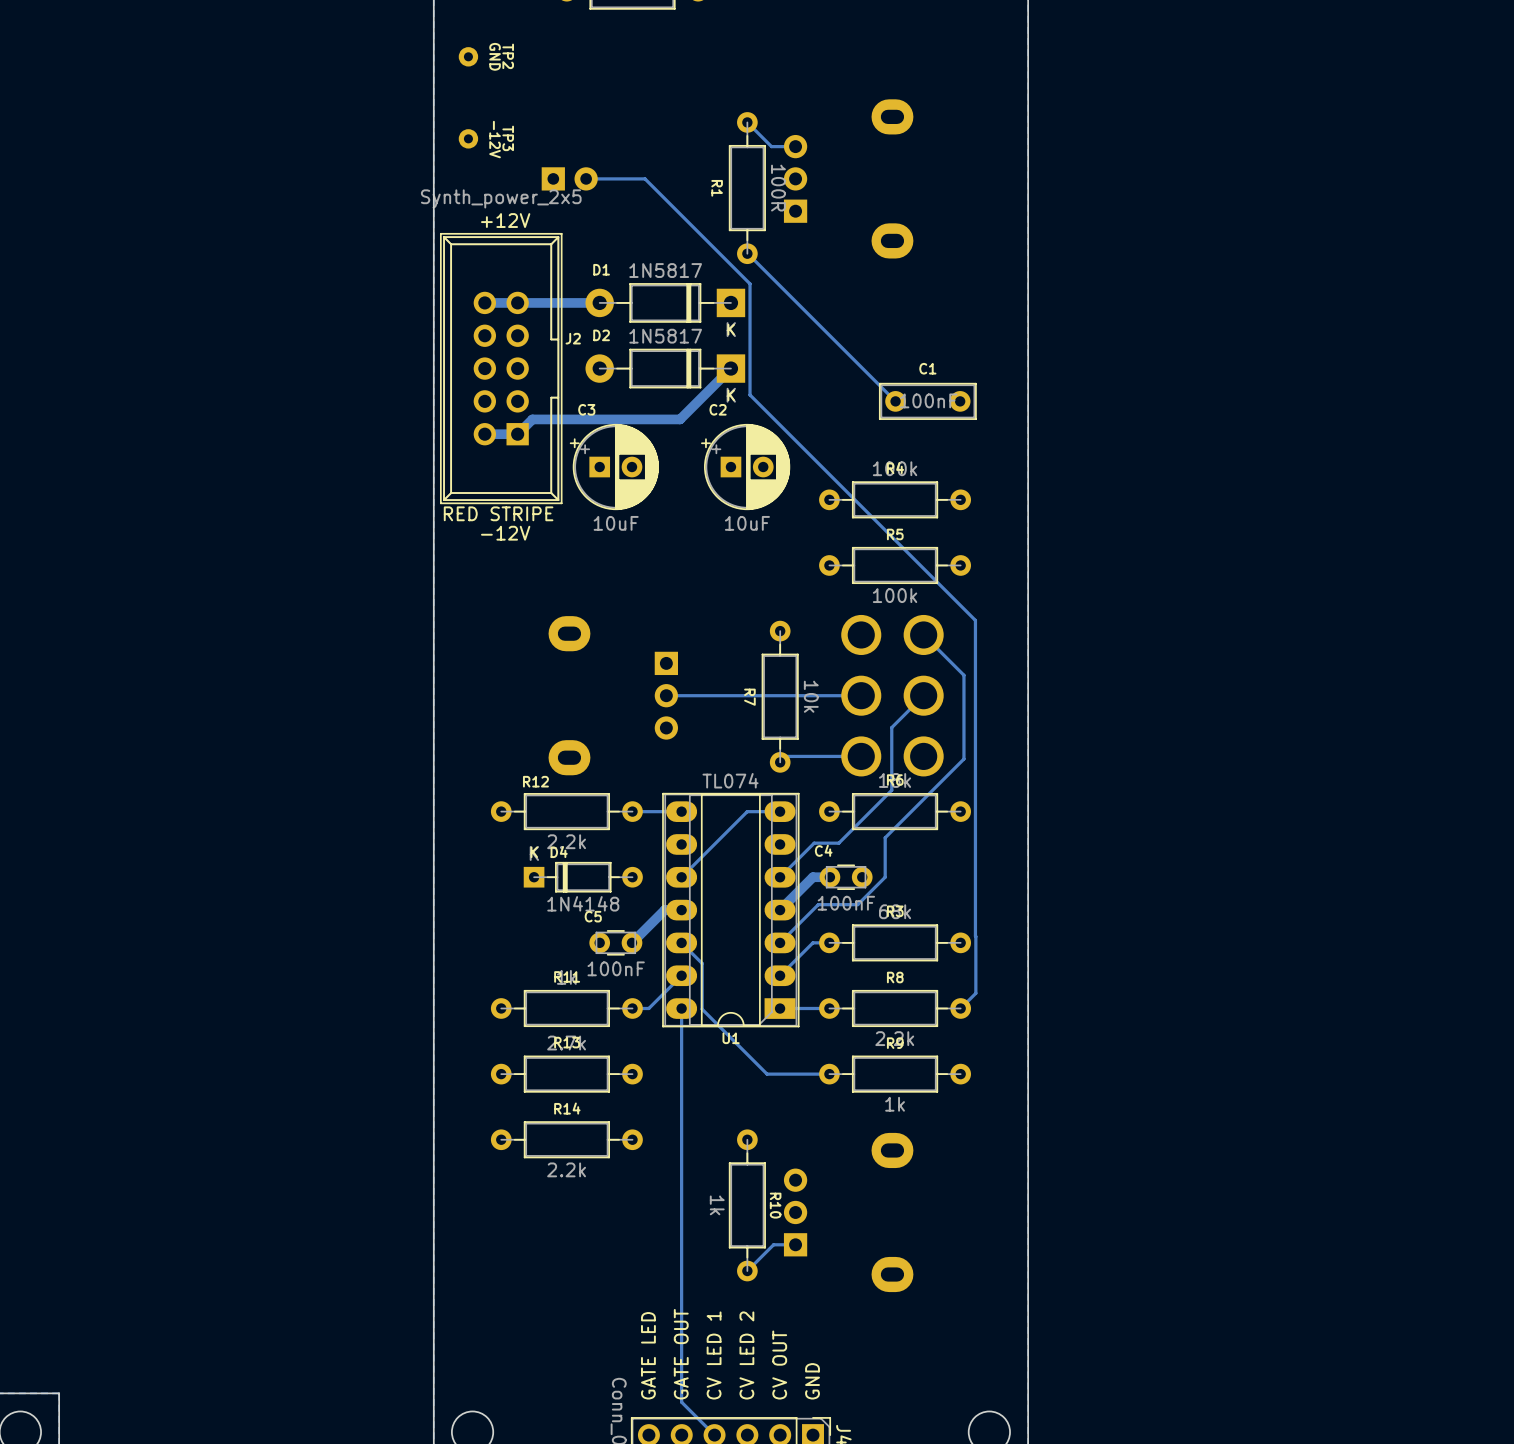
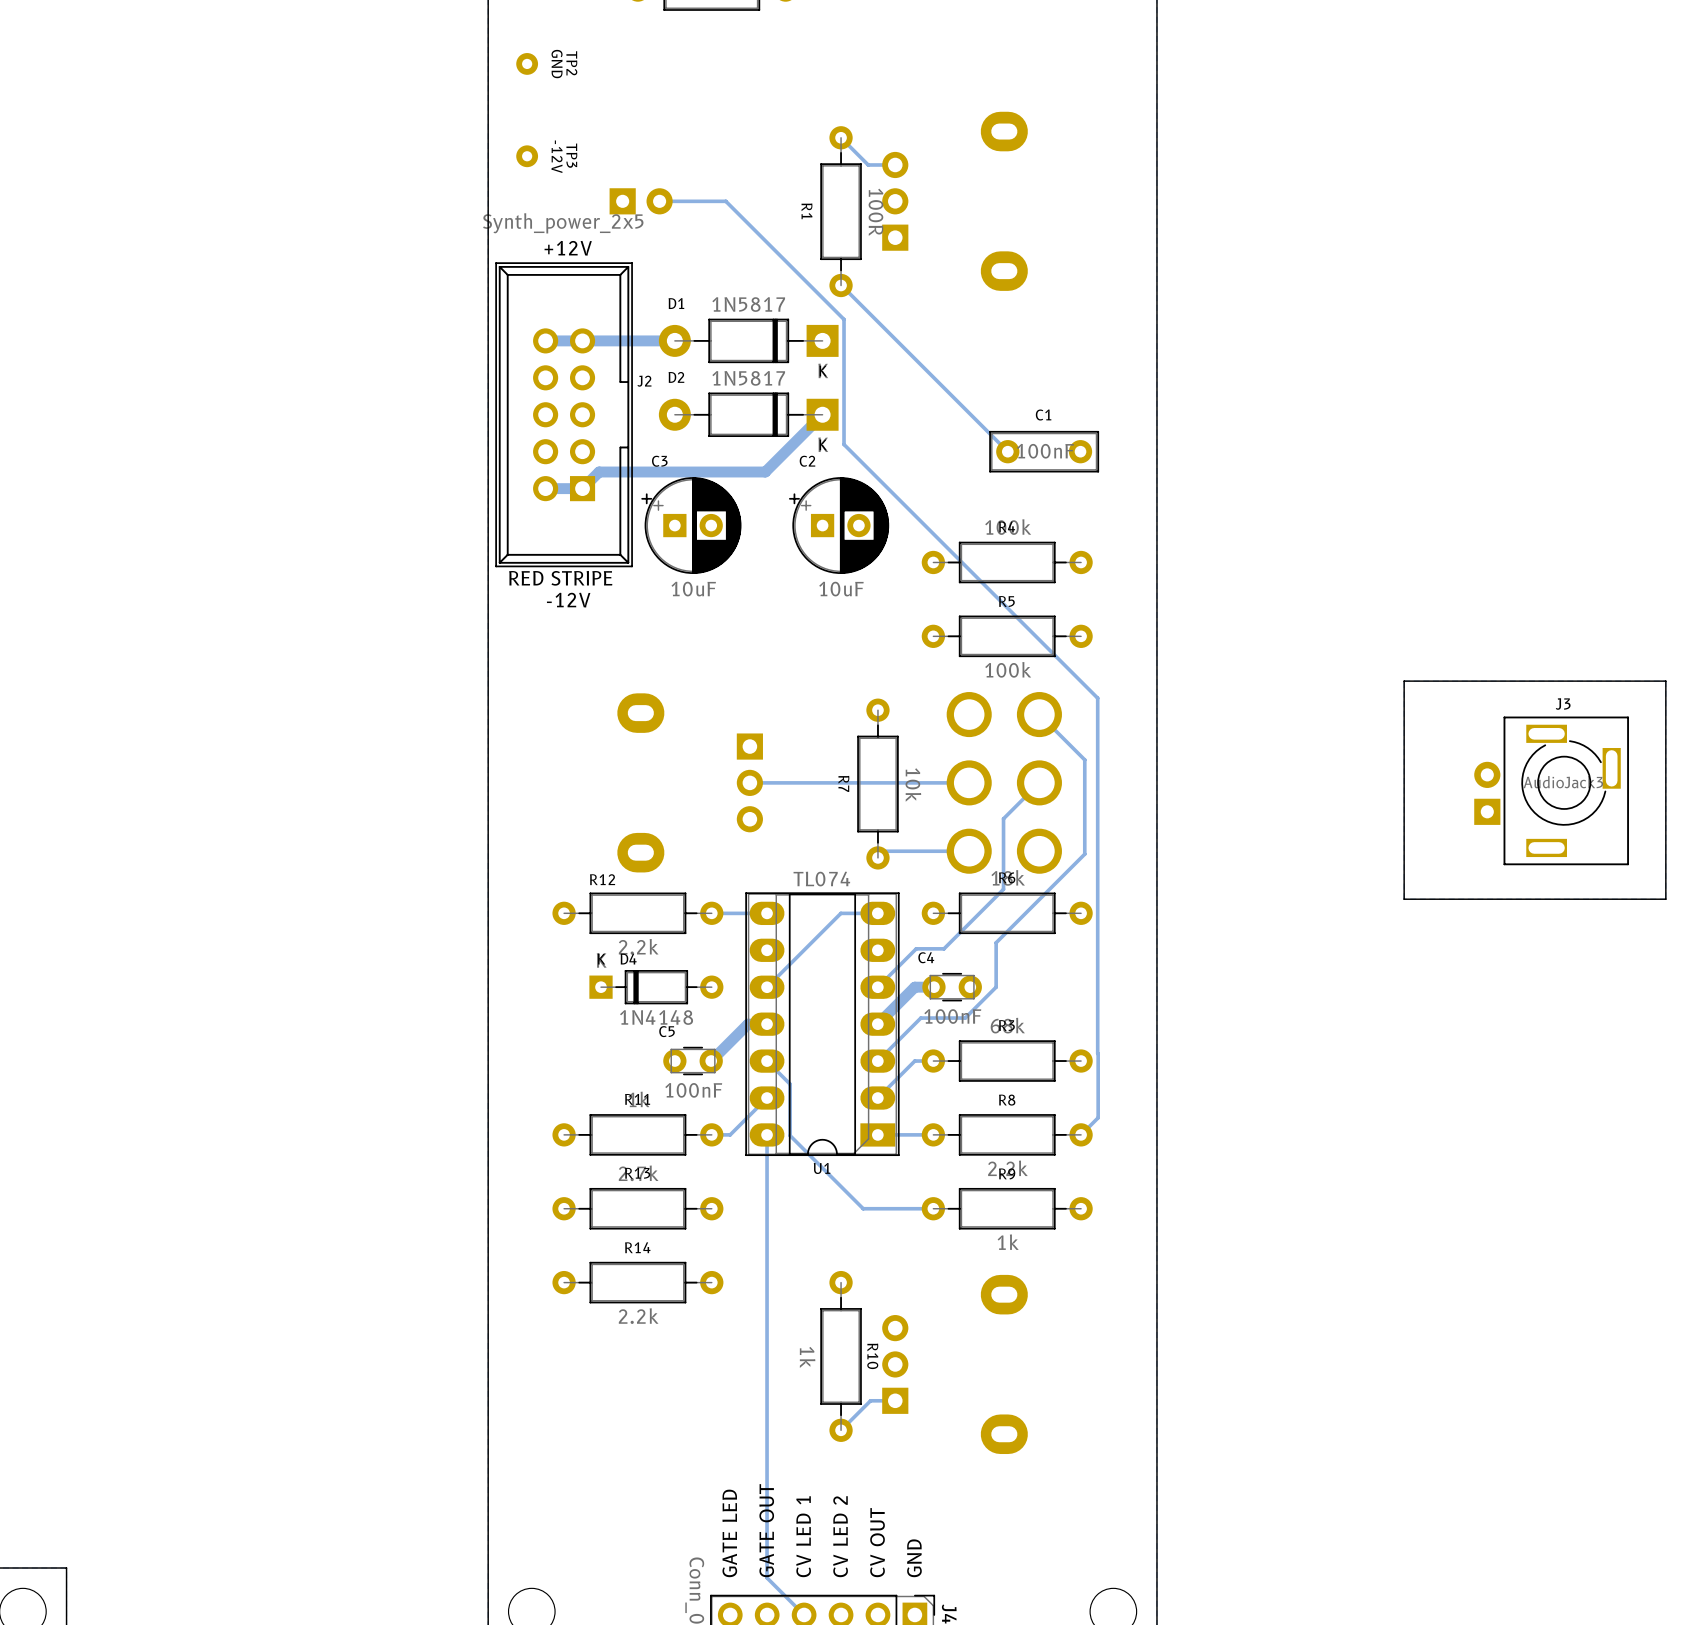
board edge: none -> (1665, 681) (1404, 681) (1404, 899) (1665, 899) (1665, 681)
J3: none -> AudioJack3 (1566, 790)
part: none -> (1487, 793)

